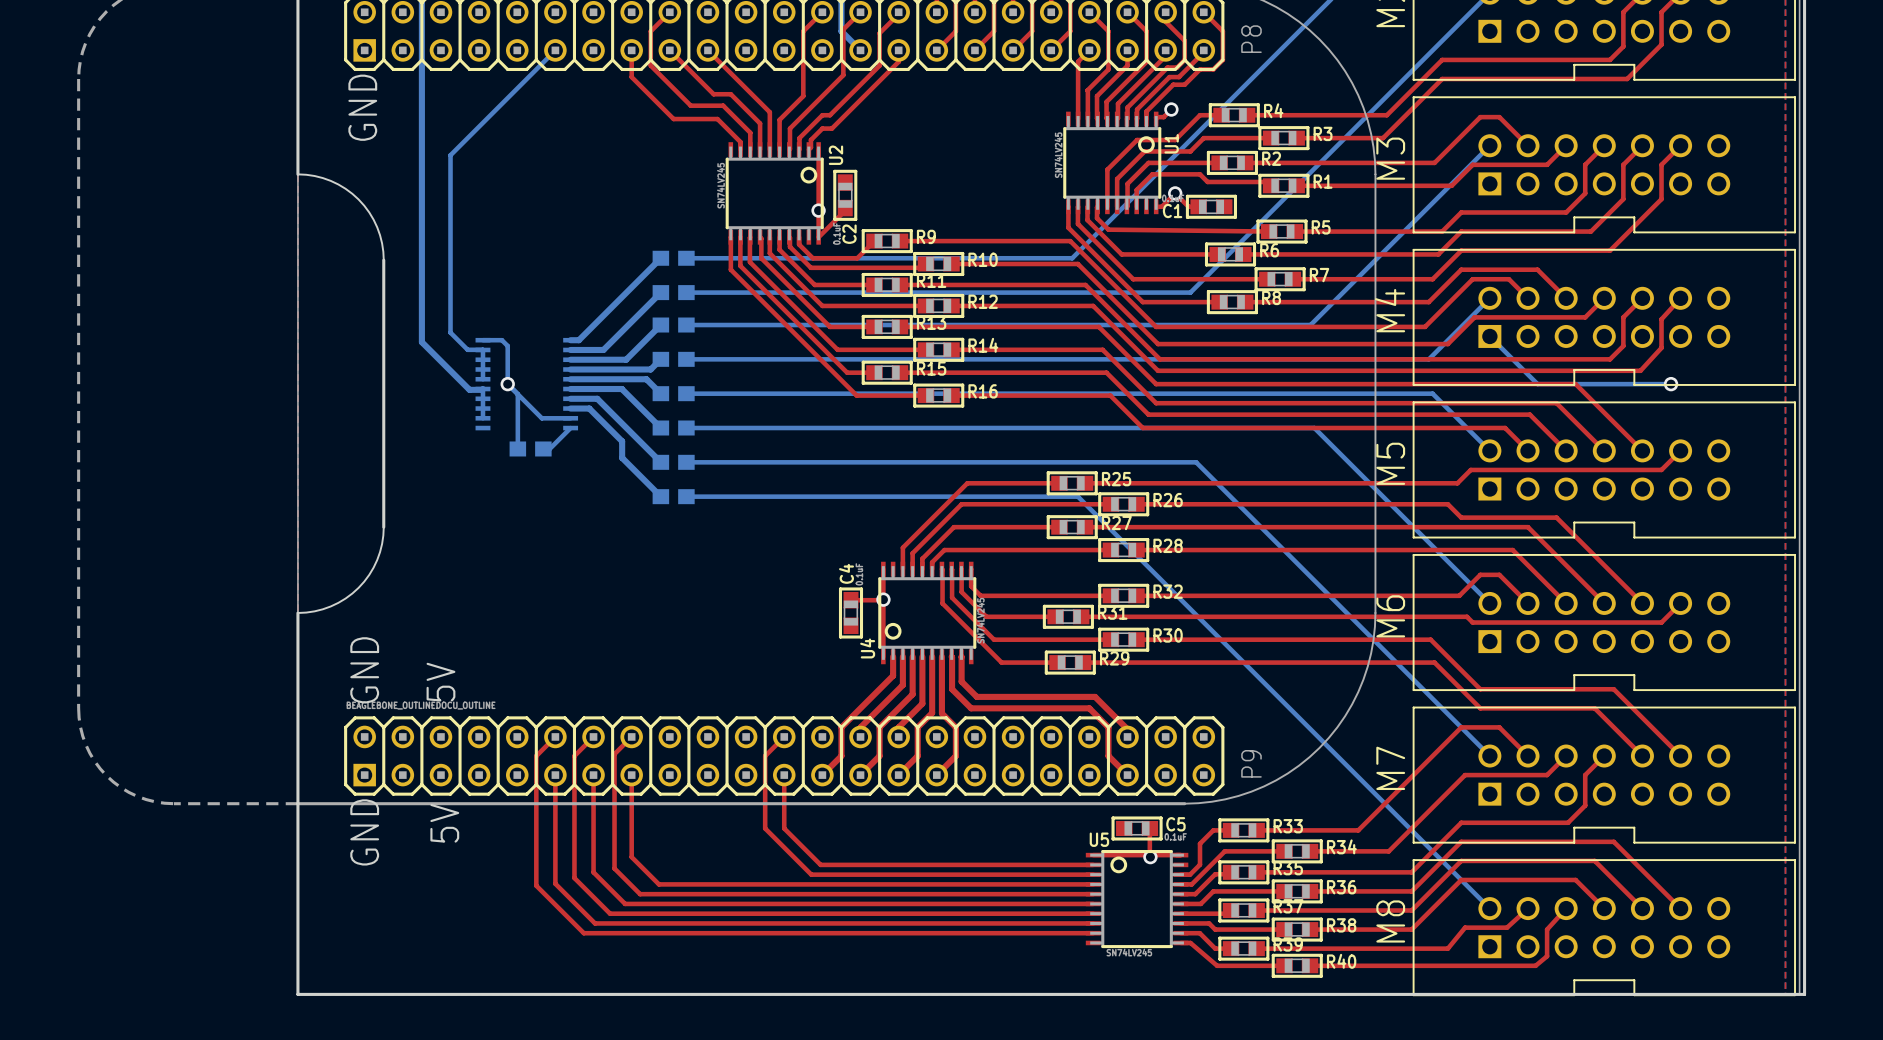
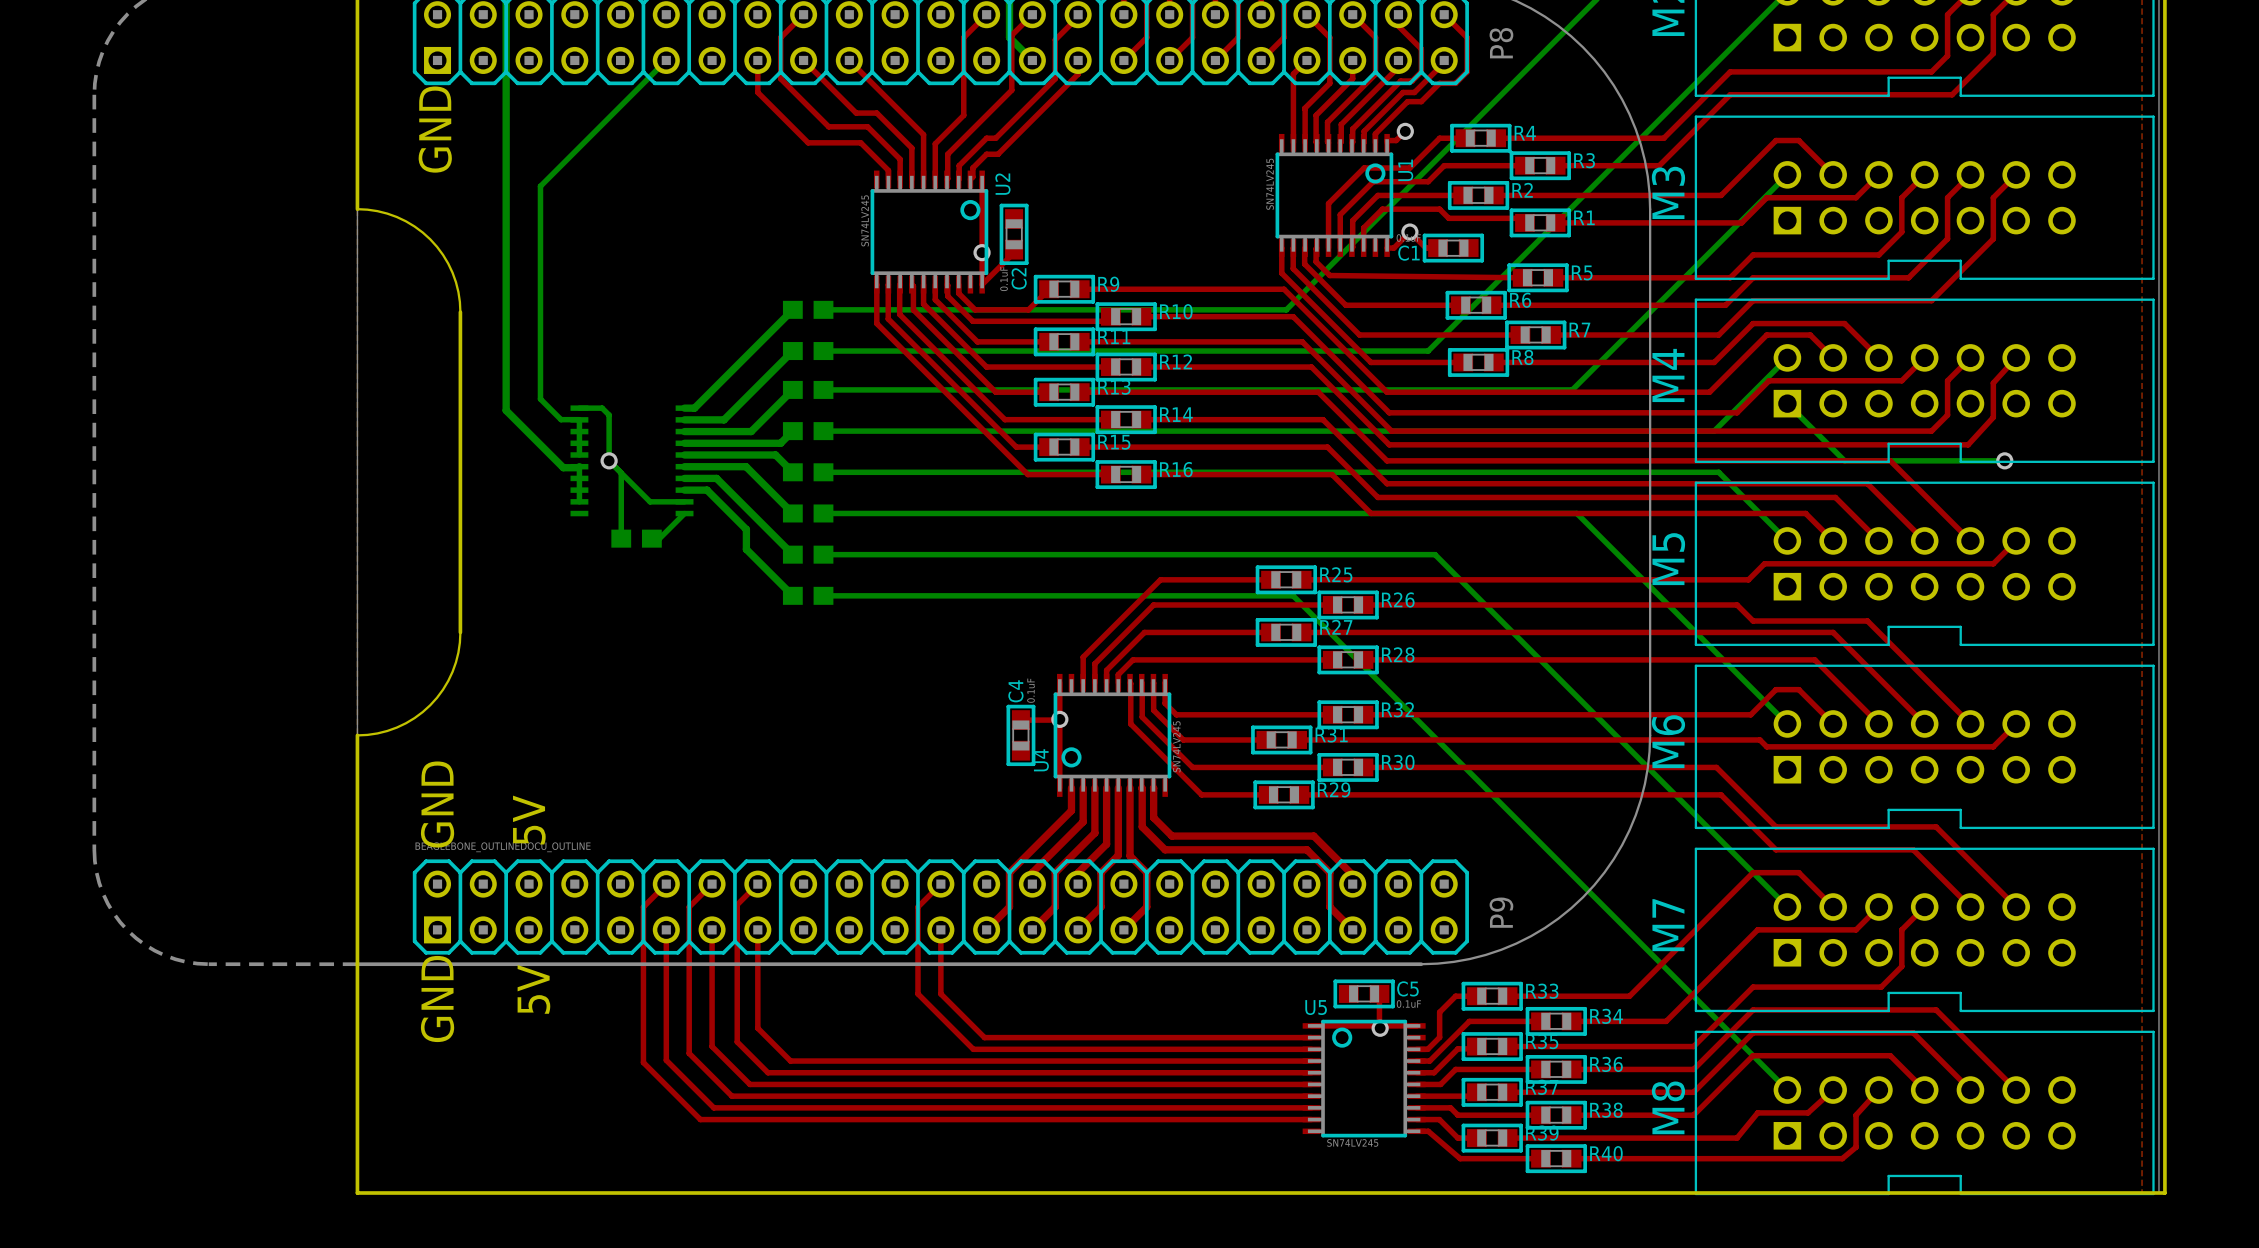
U4 name position: U4 (867, 648) -> U4 (1041, 760)

